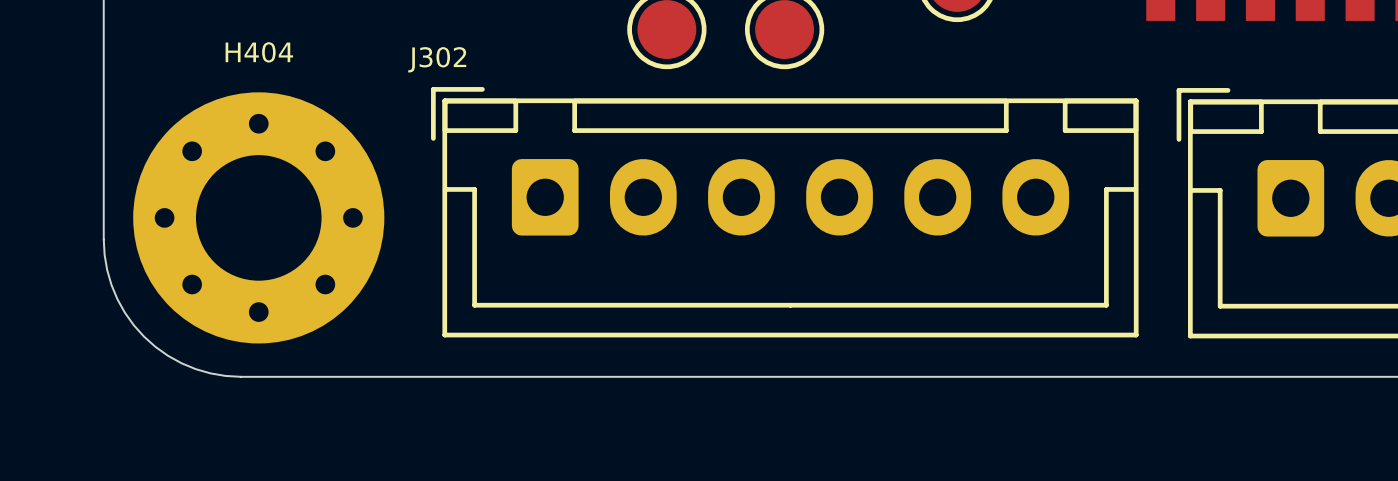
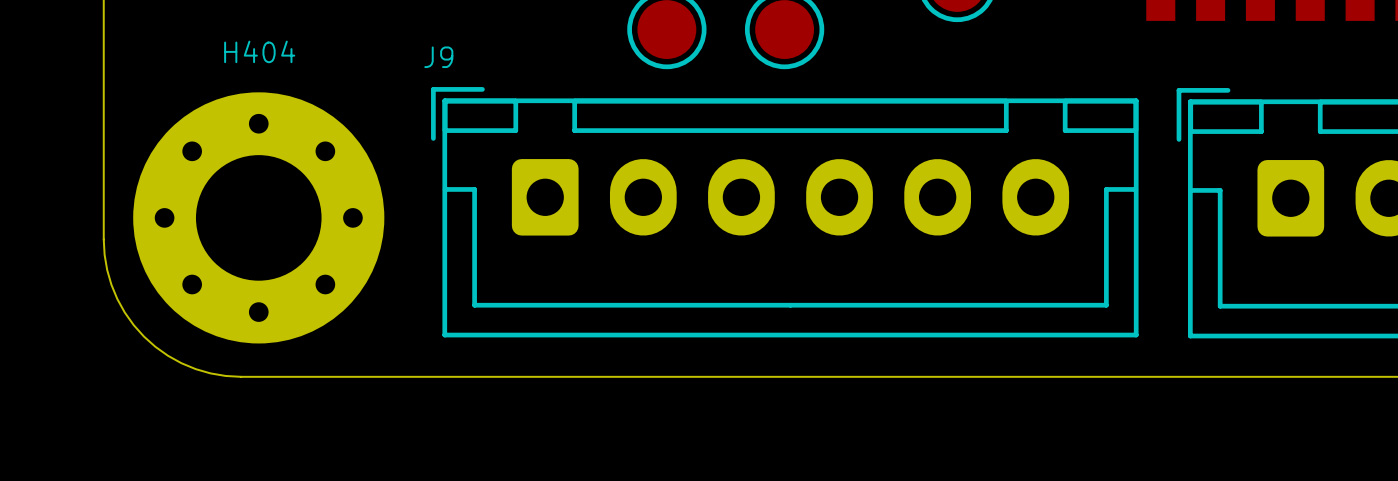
J302 name: J302 (437, 59) -> J9 (438, 57)

